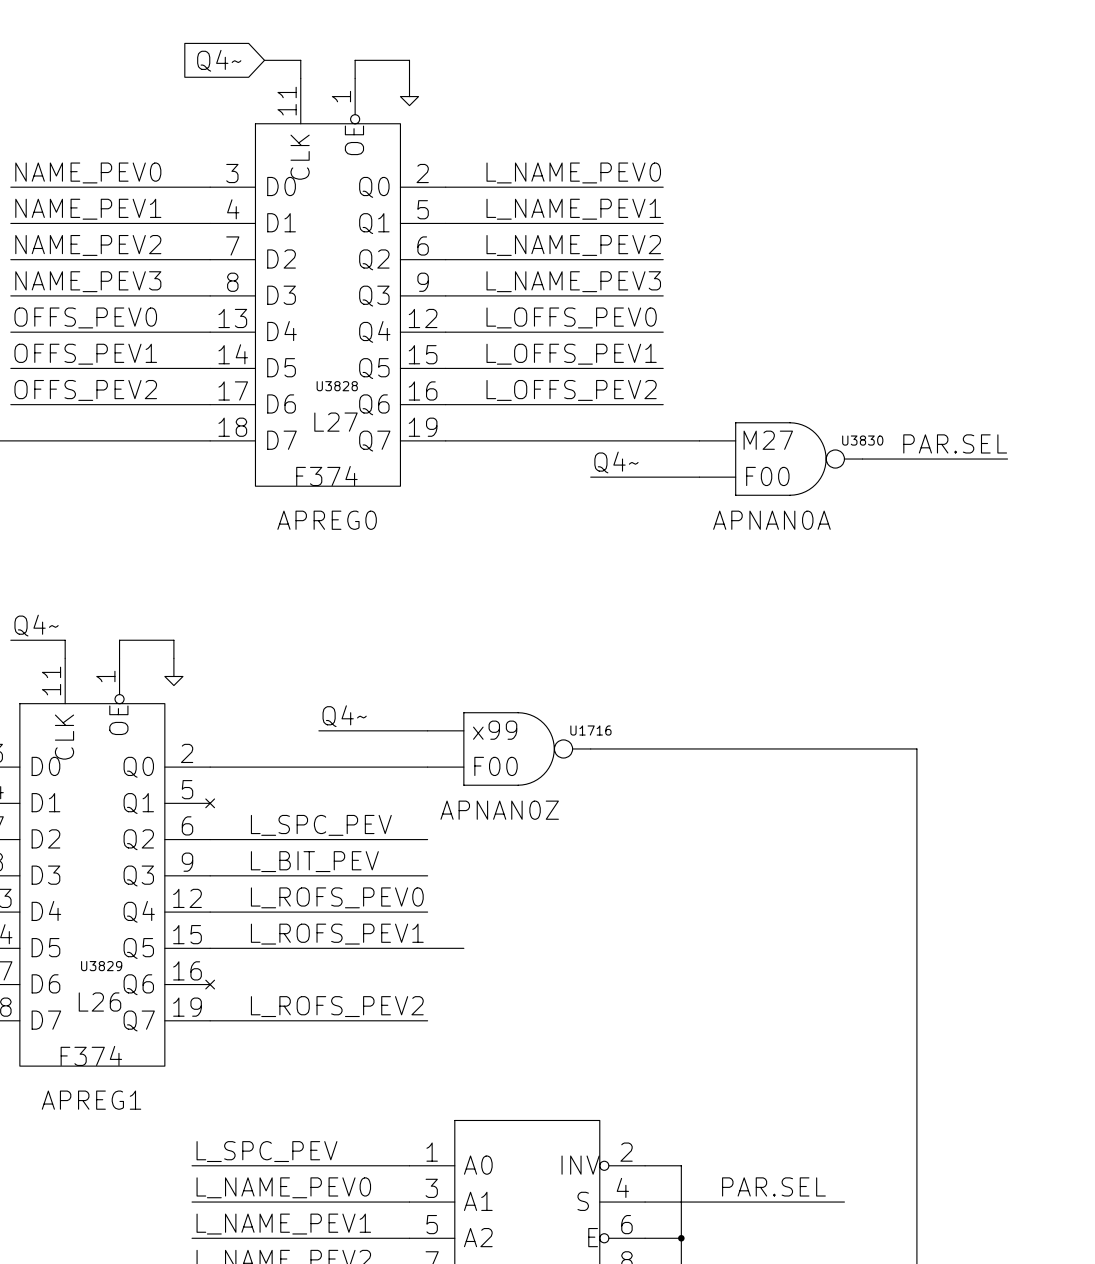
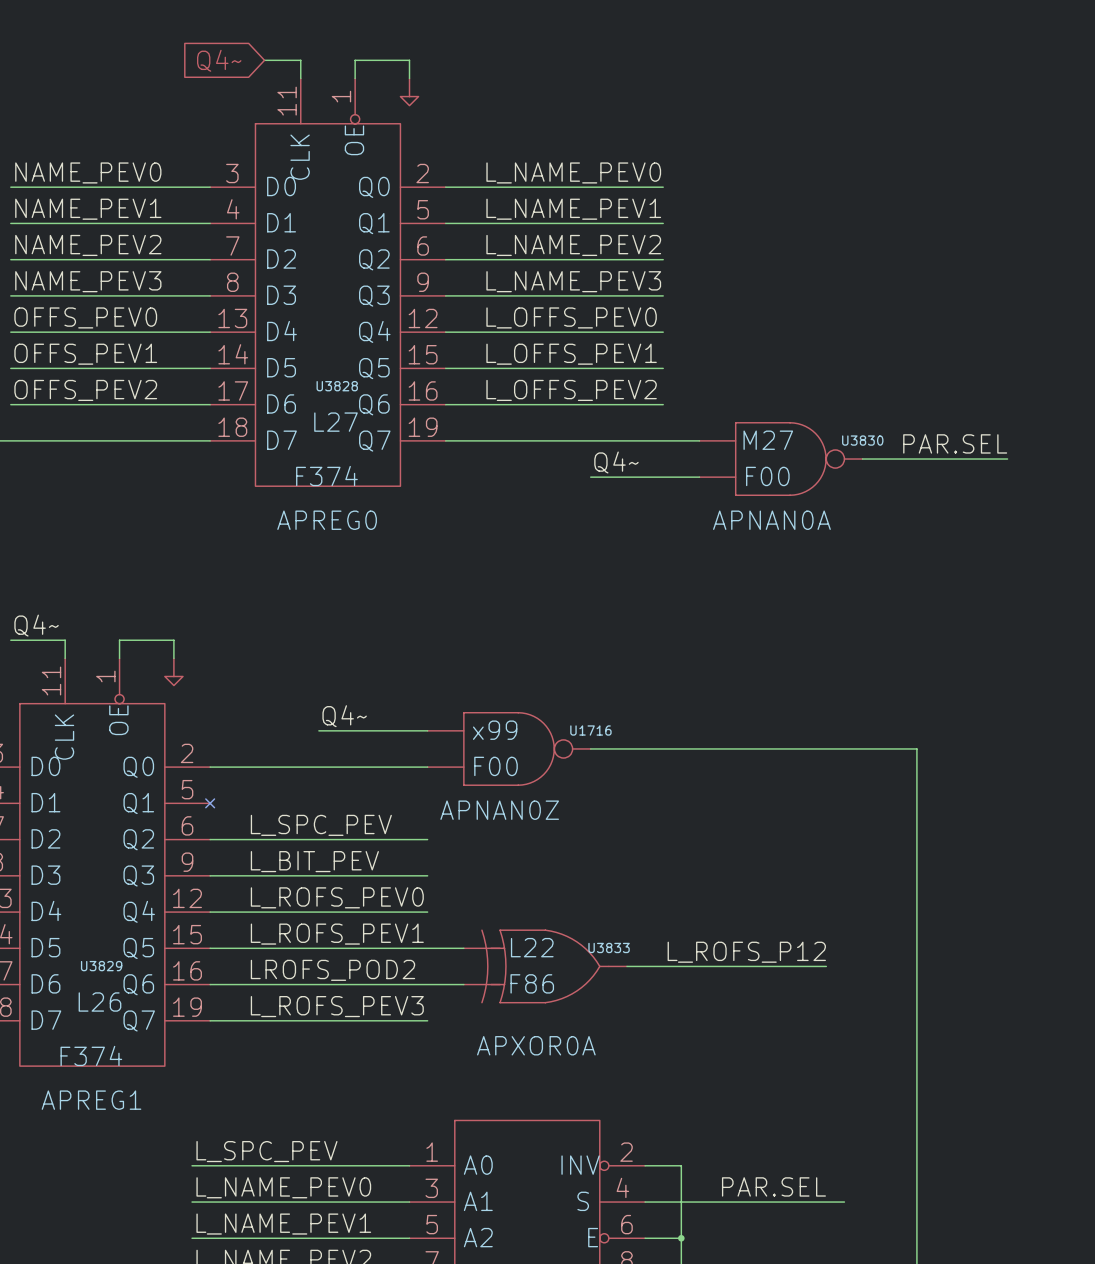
label: none -> L_ROFS_P12 (746, 952)
U3833: none -> F86 (545, 966)
wire: none -> (626, 966) (826, 966)
label: none -> LROFS_POD2 (332, 970)
wire: none -> (210, 984) (463, 984)
no-connect mark: (210, 984) -> none
label: L_ROFS_PEV2 (337, 1006) -> L_ROFS_PEV3 (337, 1006)

